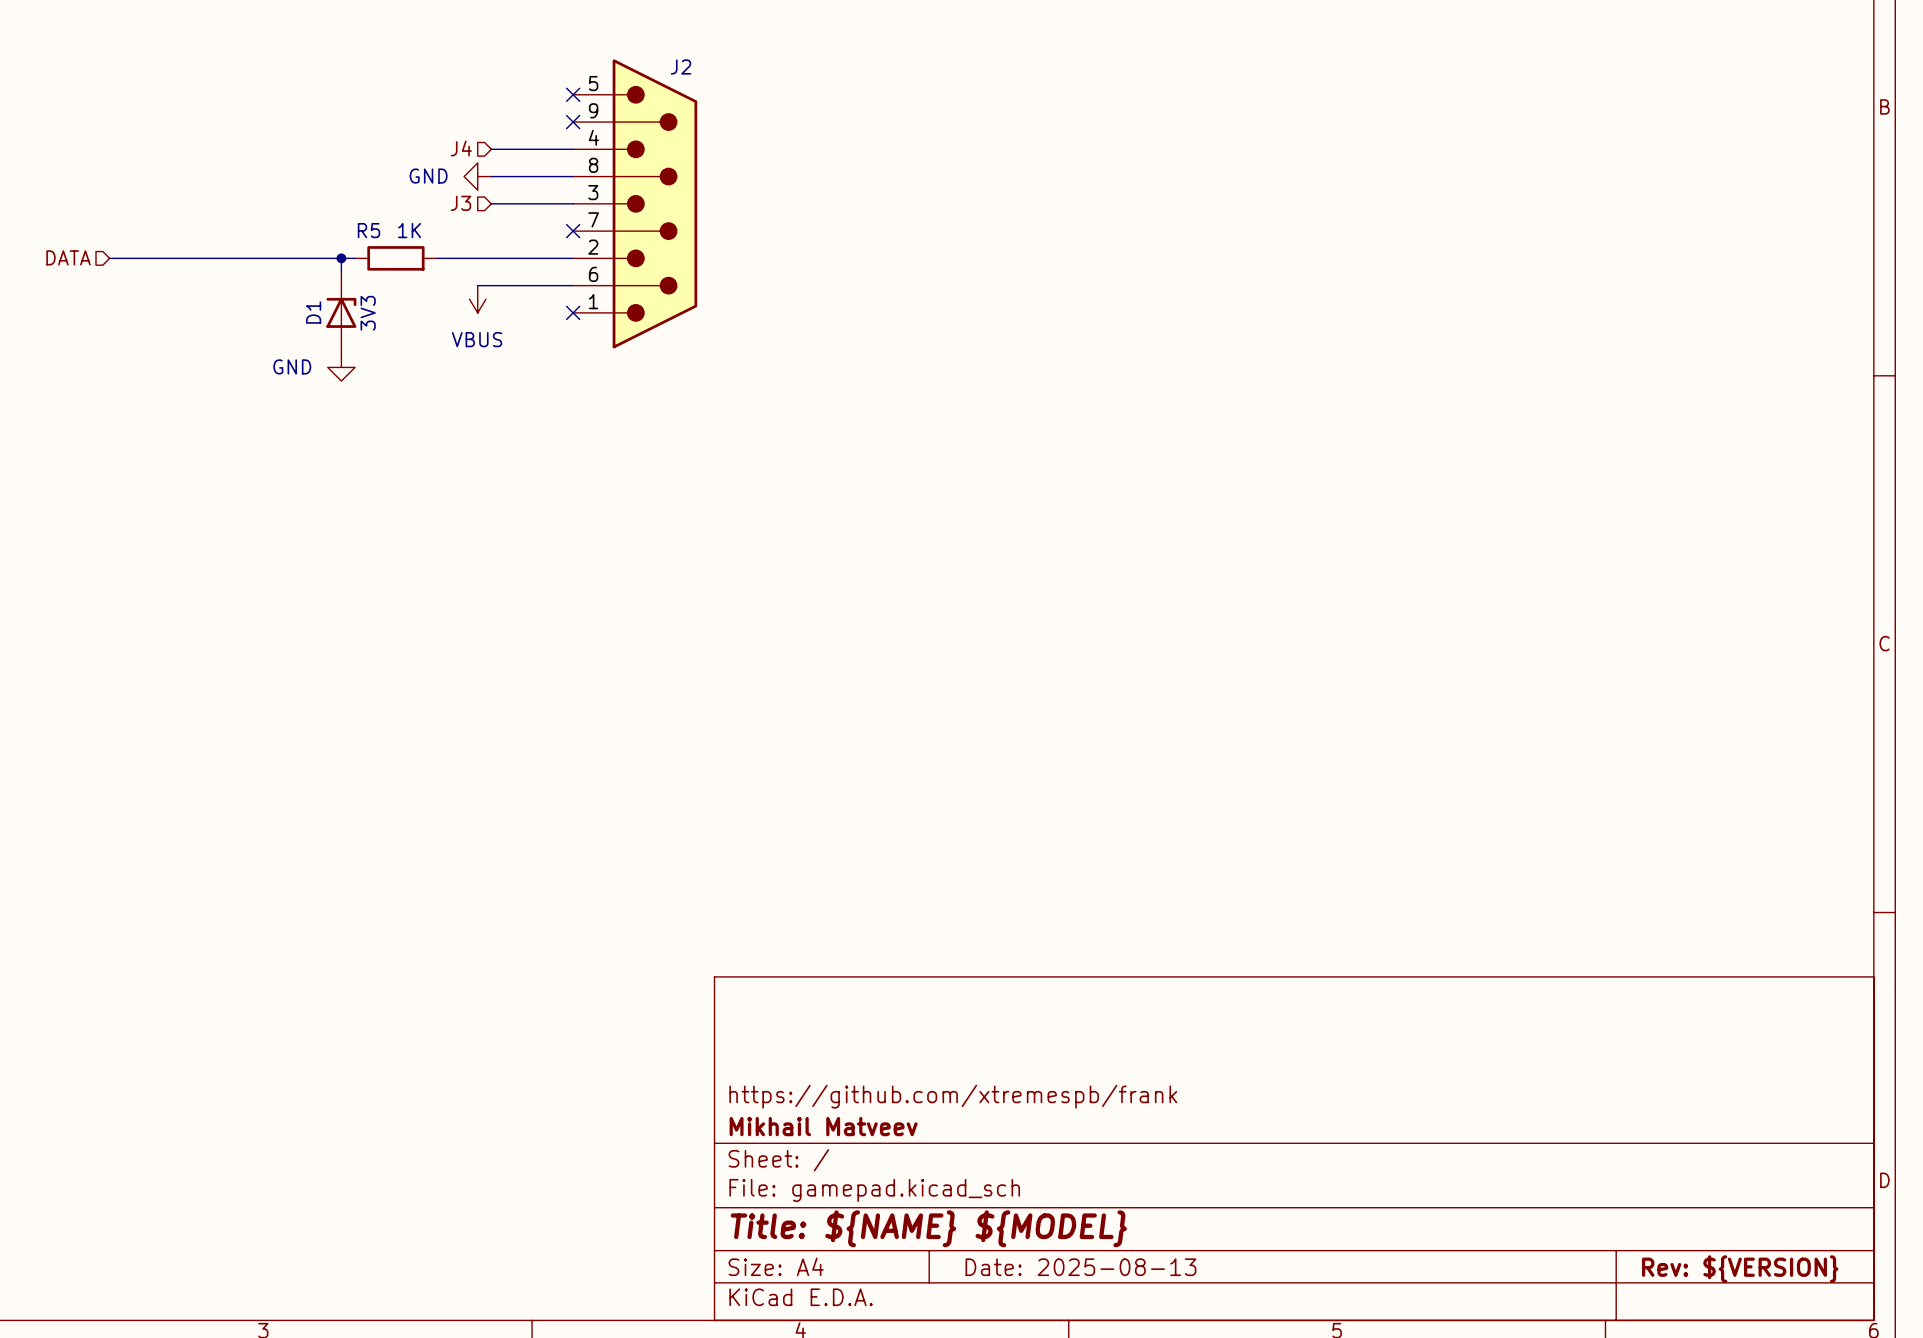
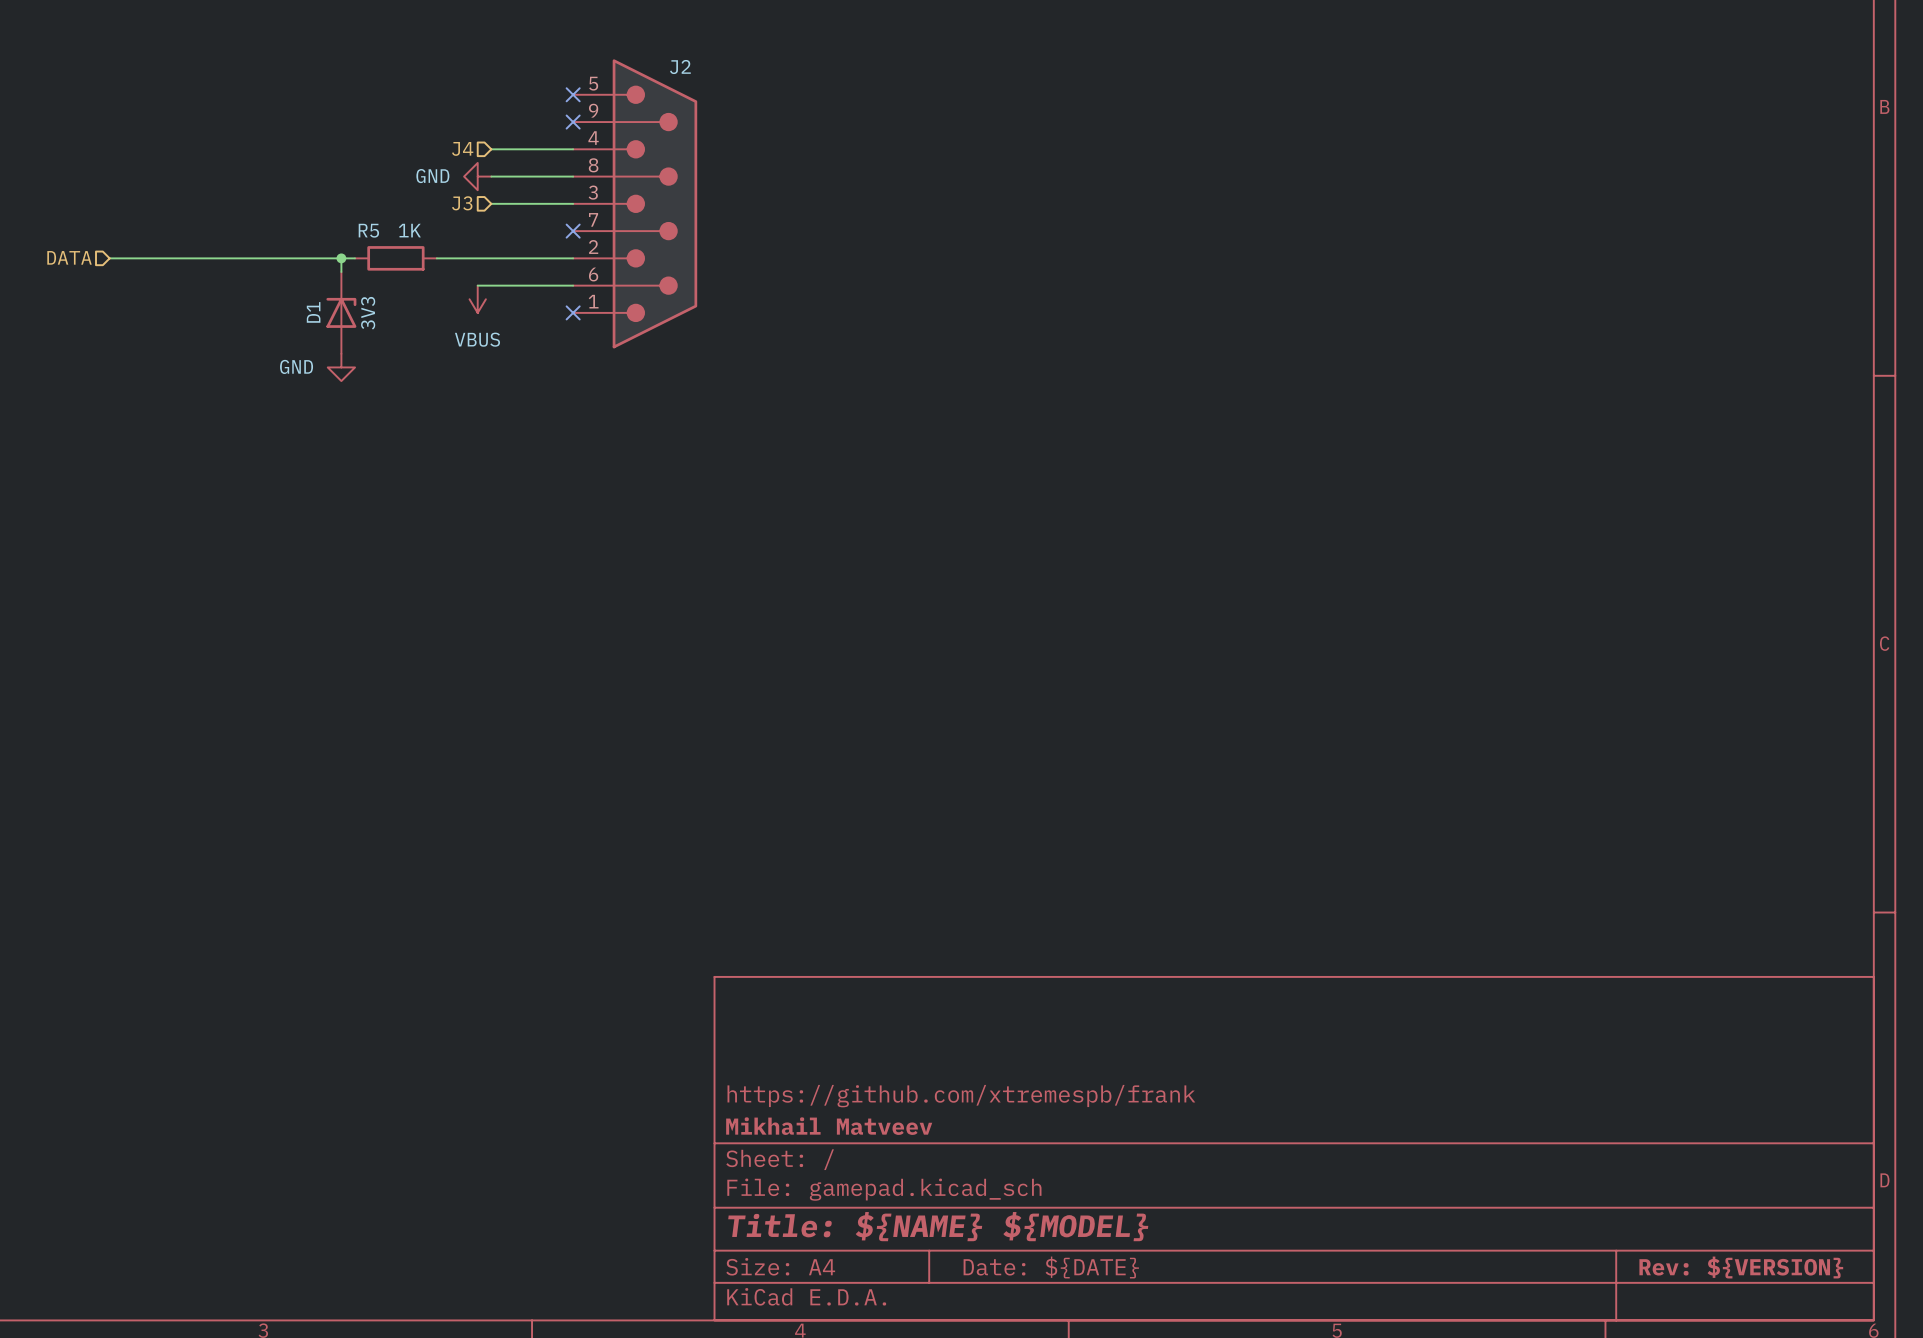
title block: Date: 2025-08-13 (1080, 1267) -> Date: ${DATE} (1051, 1267)

